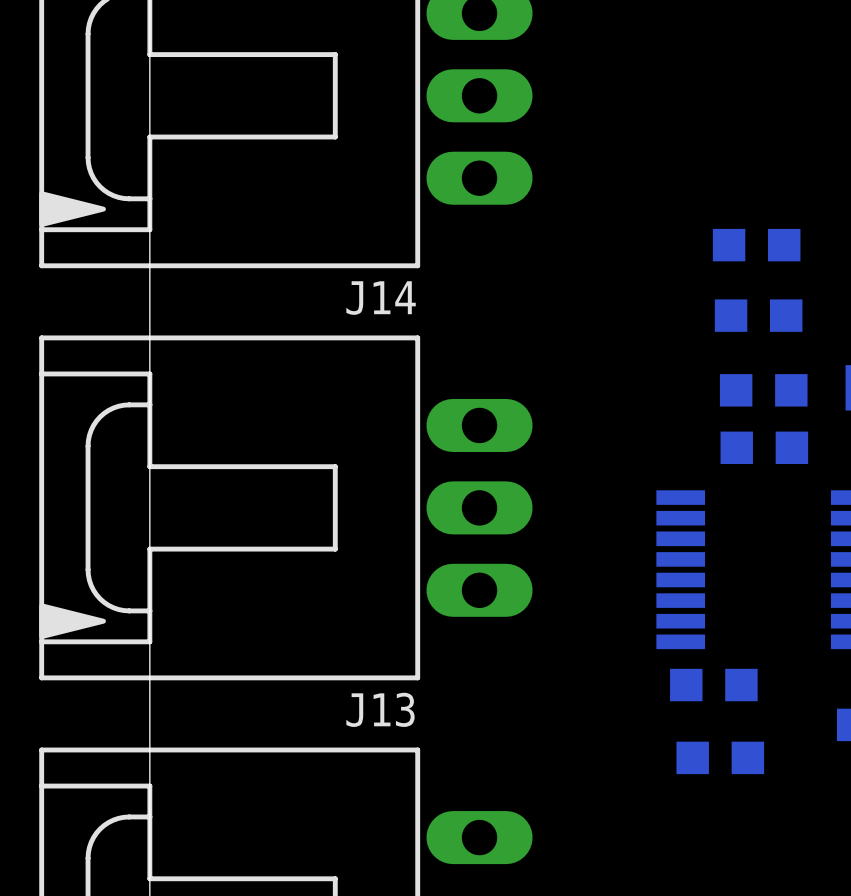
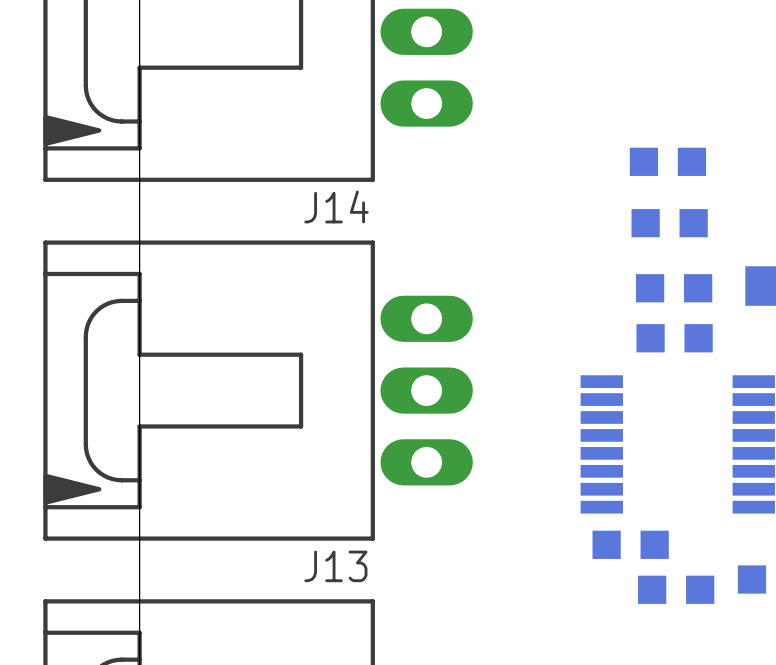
part position: (720, 757) -> (676, 589)

